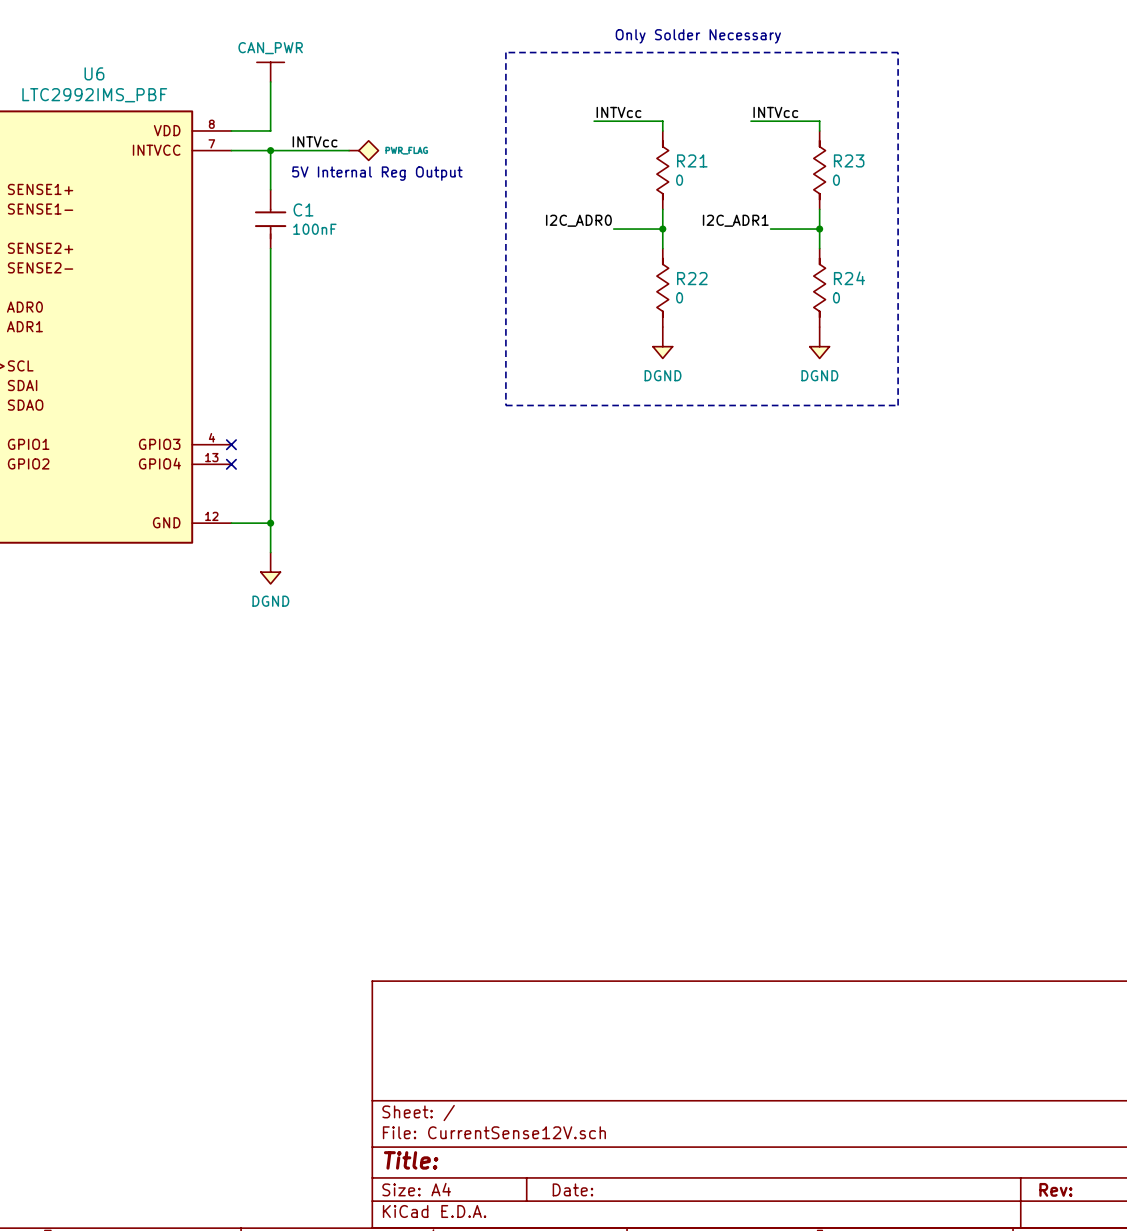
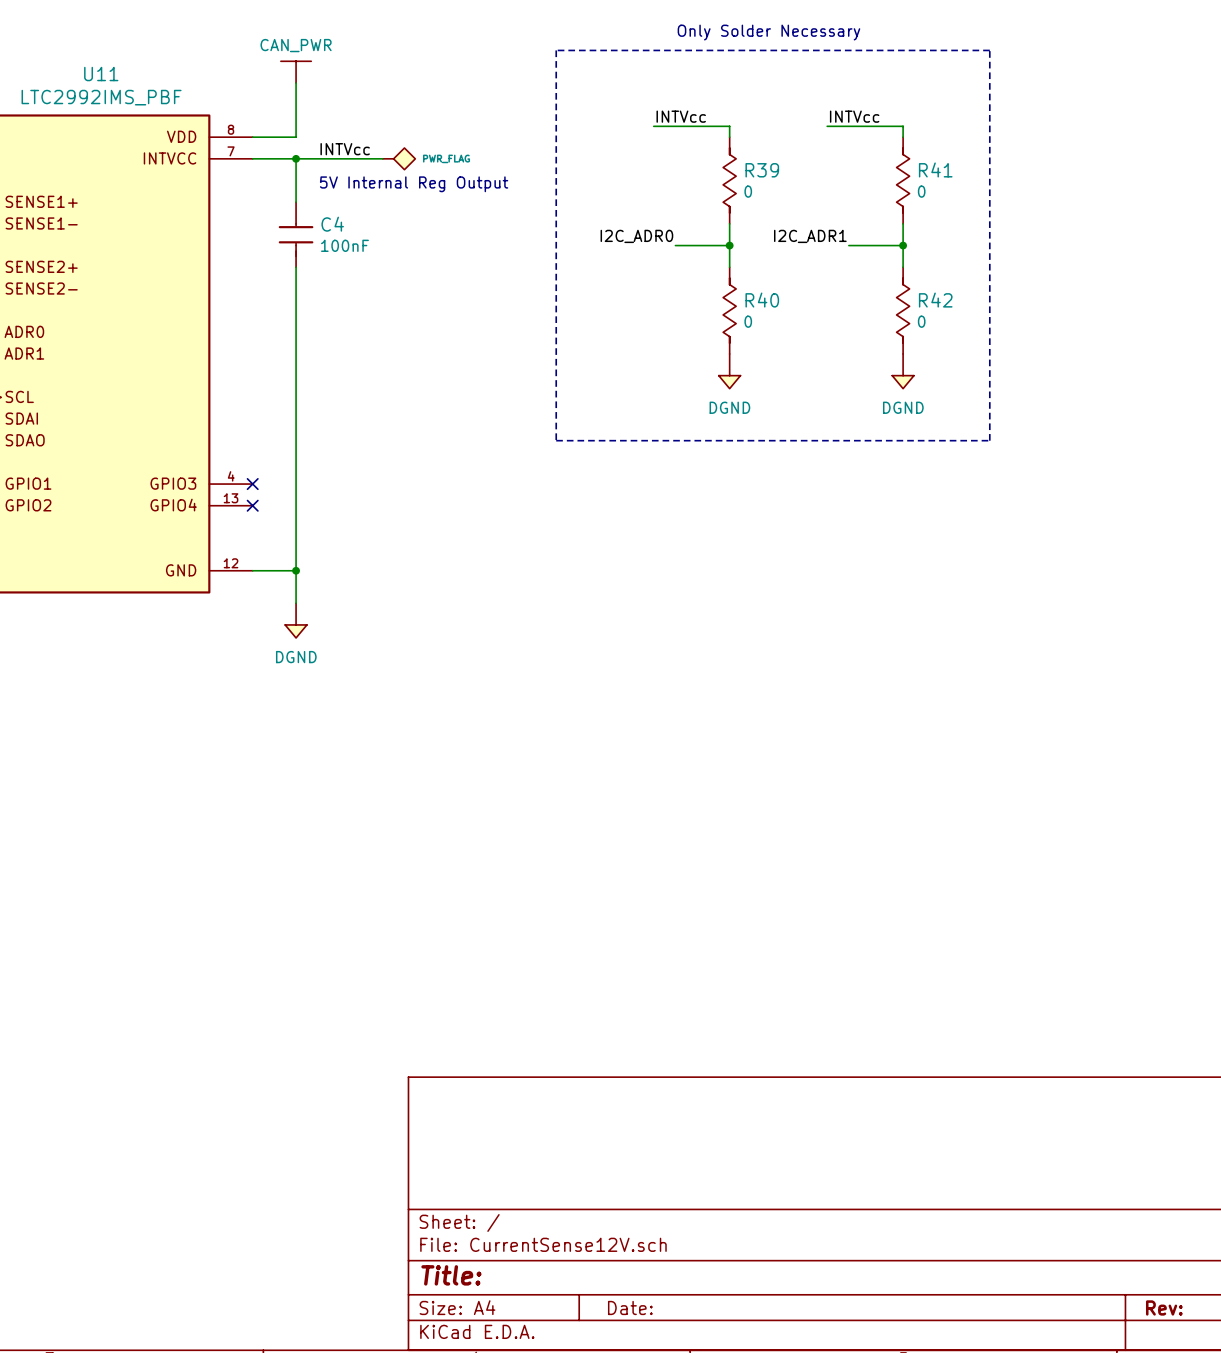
U6 name: U6 (94, 73) -> U11 (101, 74)
R21 name: R21 (692, 160) -> R39 (762, 170)
R23 name: R23 (849, 160) -> R41 (935, 169)
C1 name: C1 (303, 209) -> C4 (332, 224)
R22 name: R22 (692, 278) -> R40 (762, 300)
R24 name: R24 (849, 278) -> R42 (935, 300)

